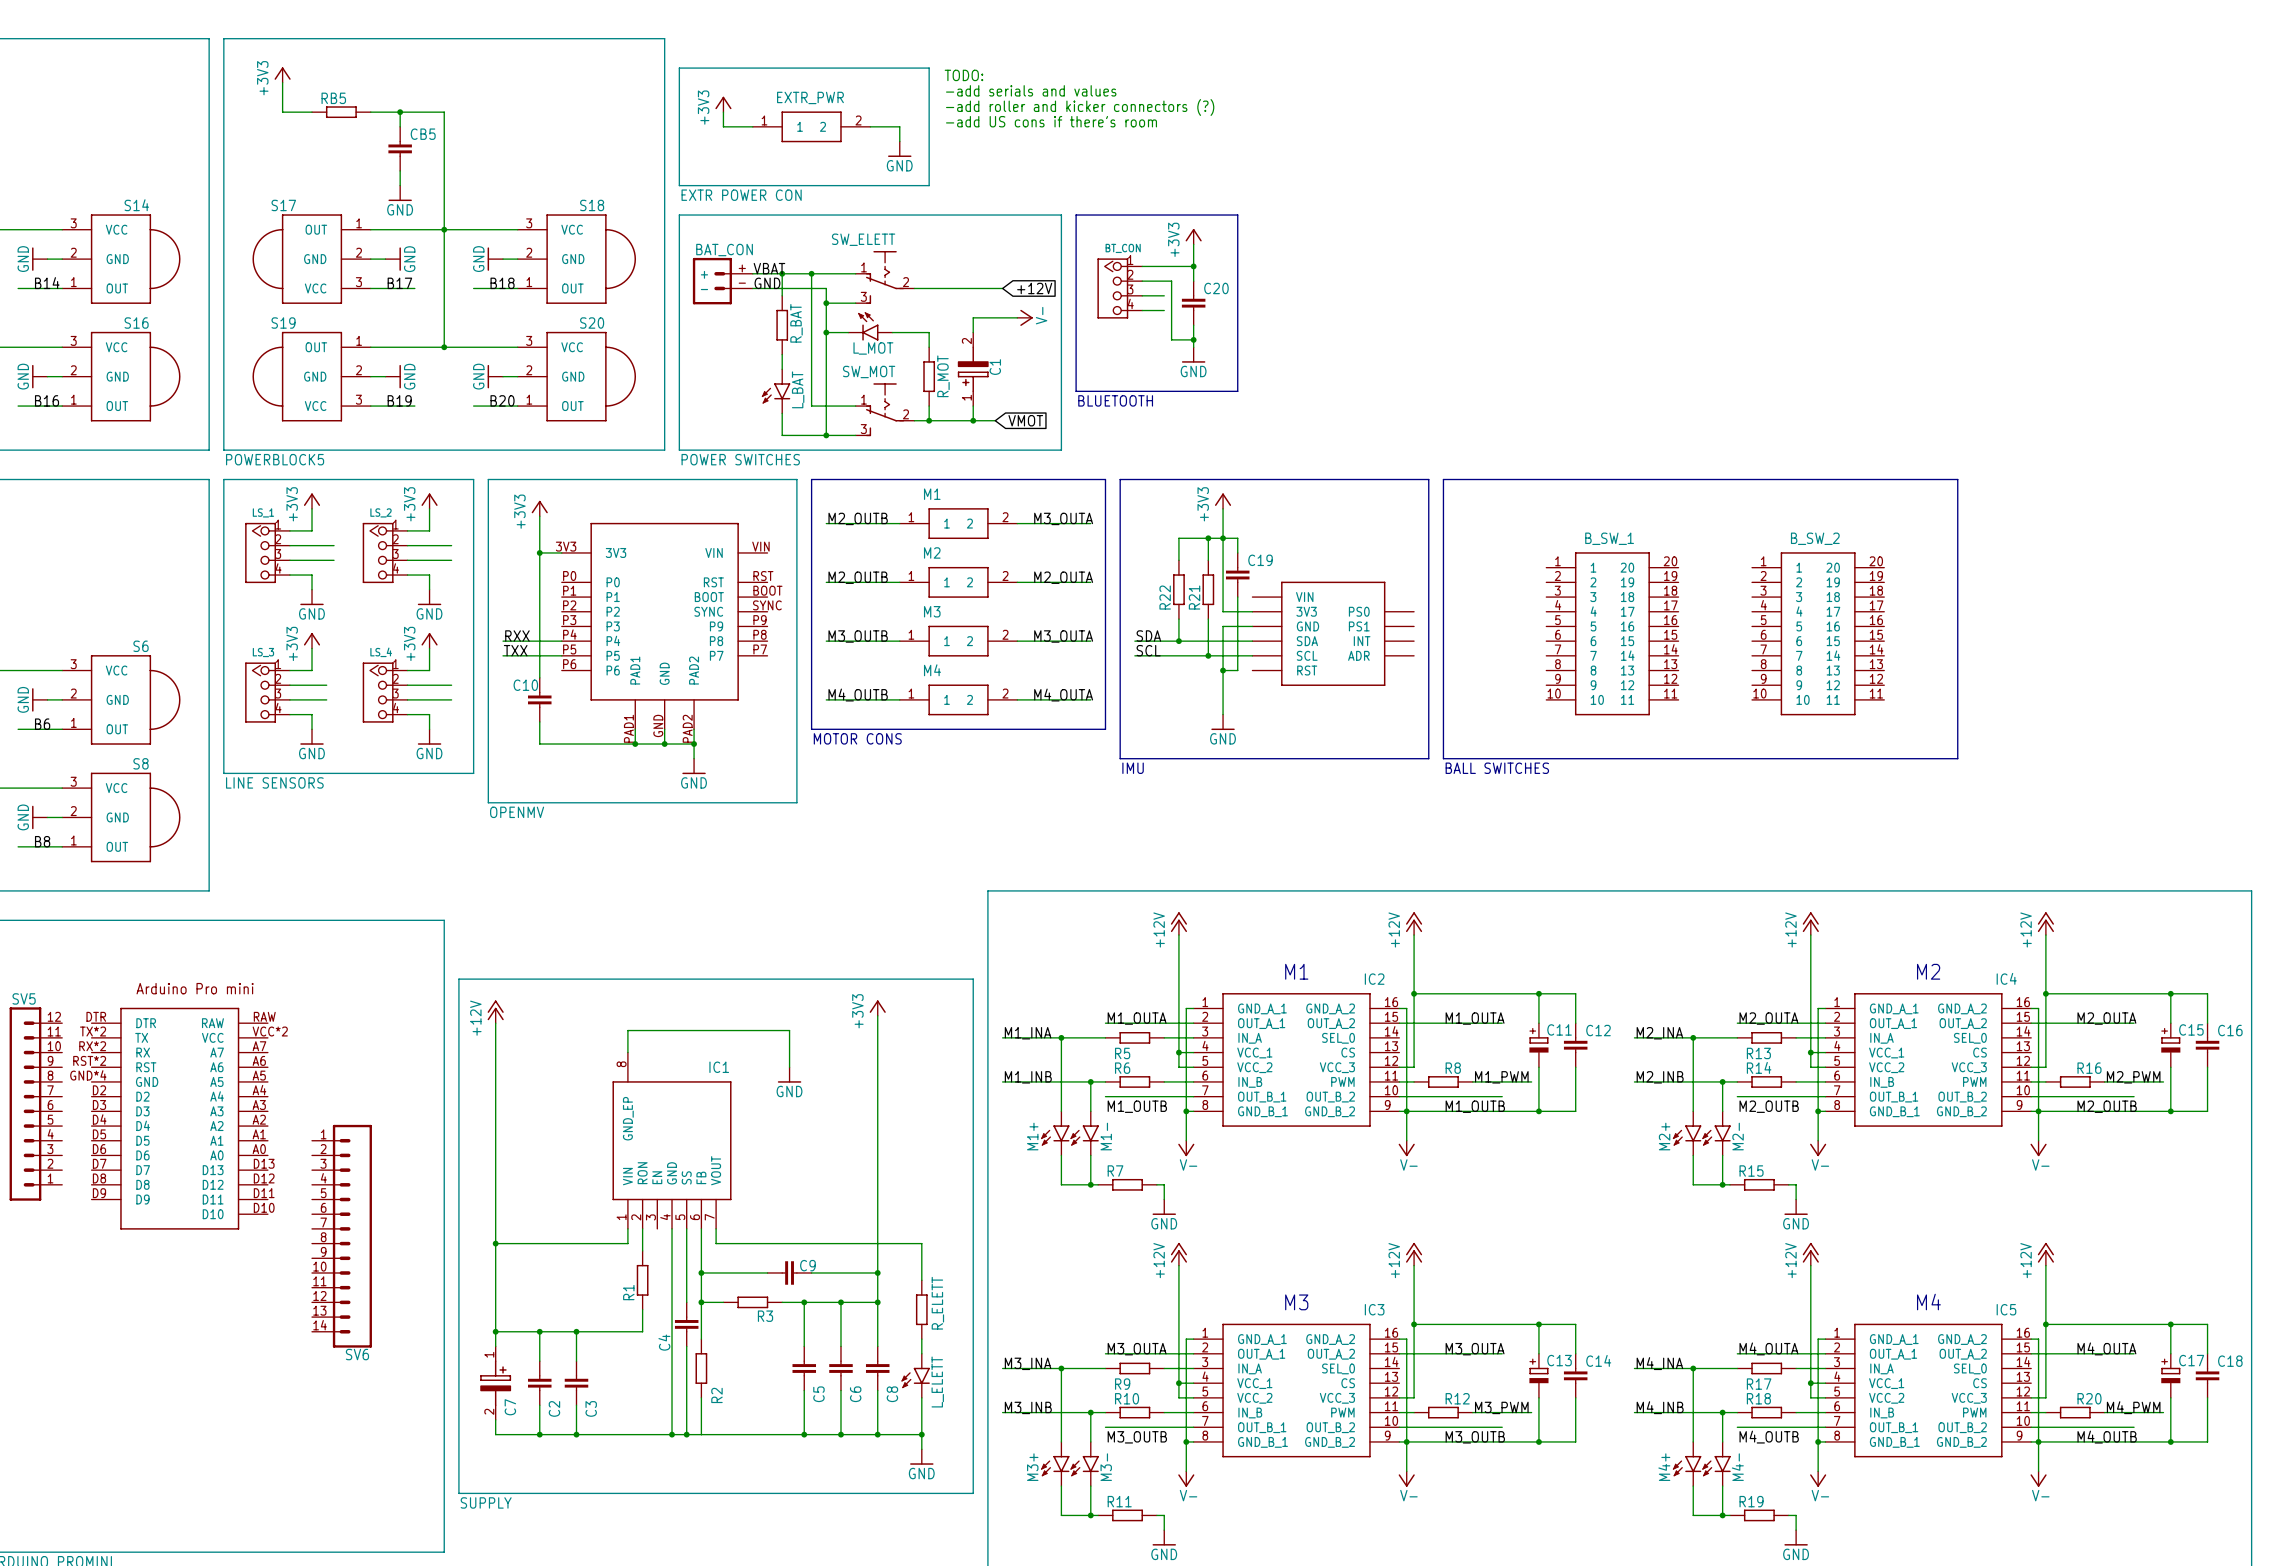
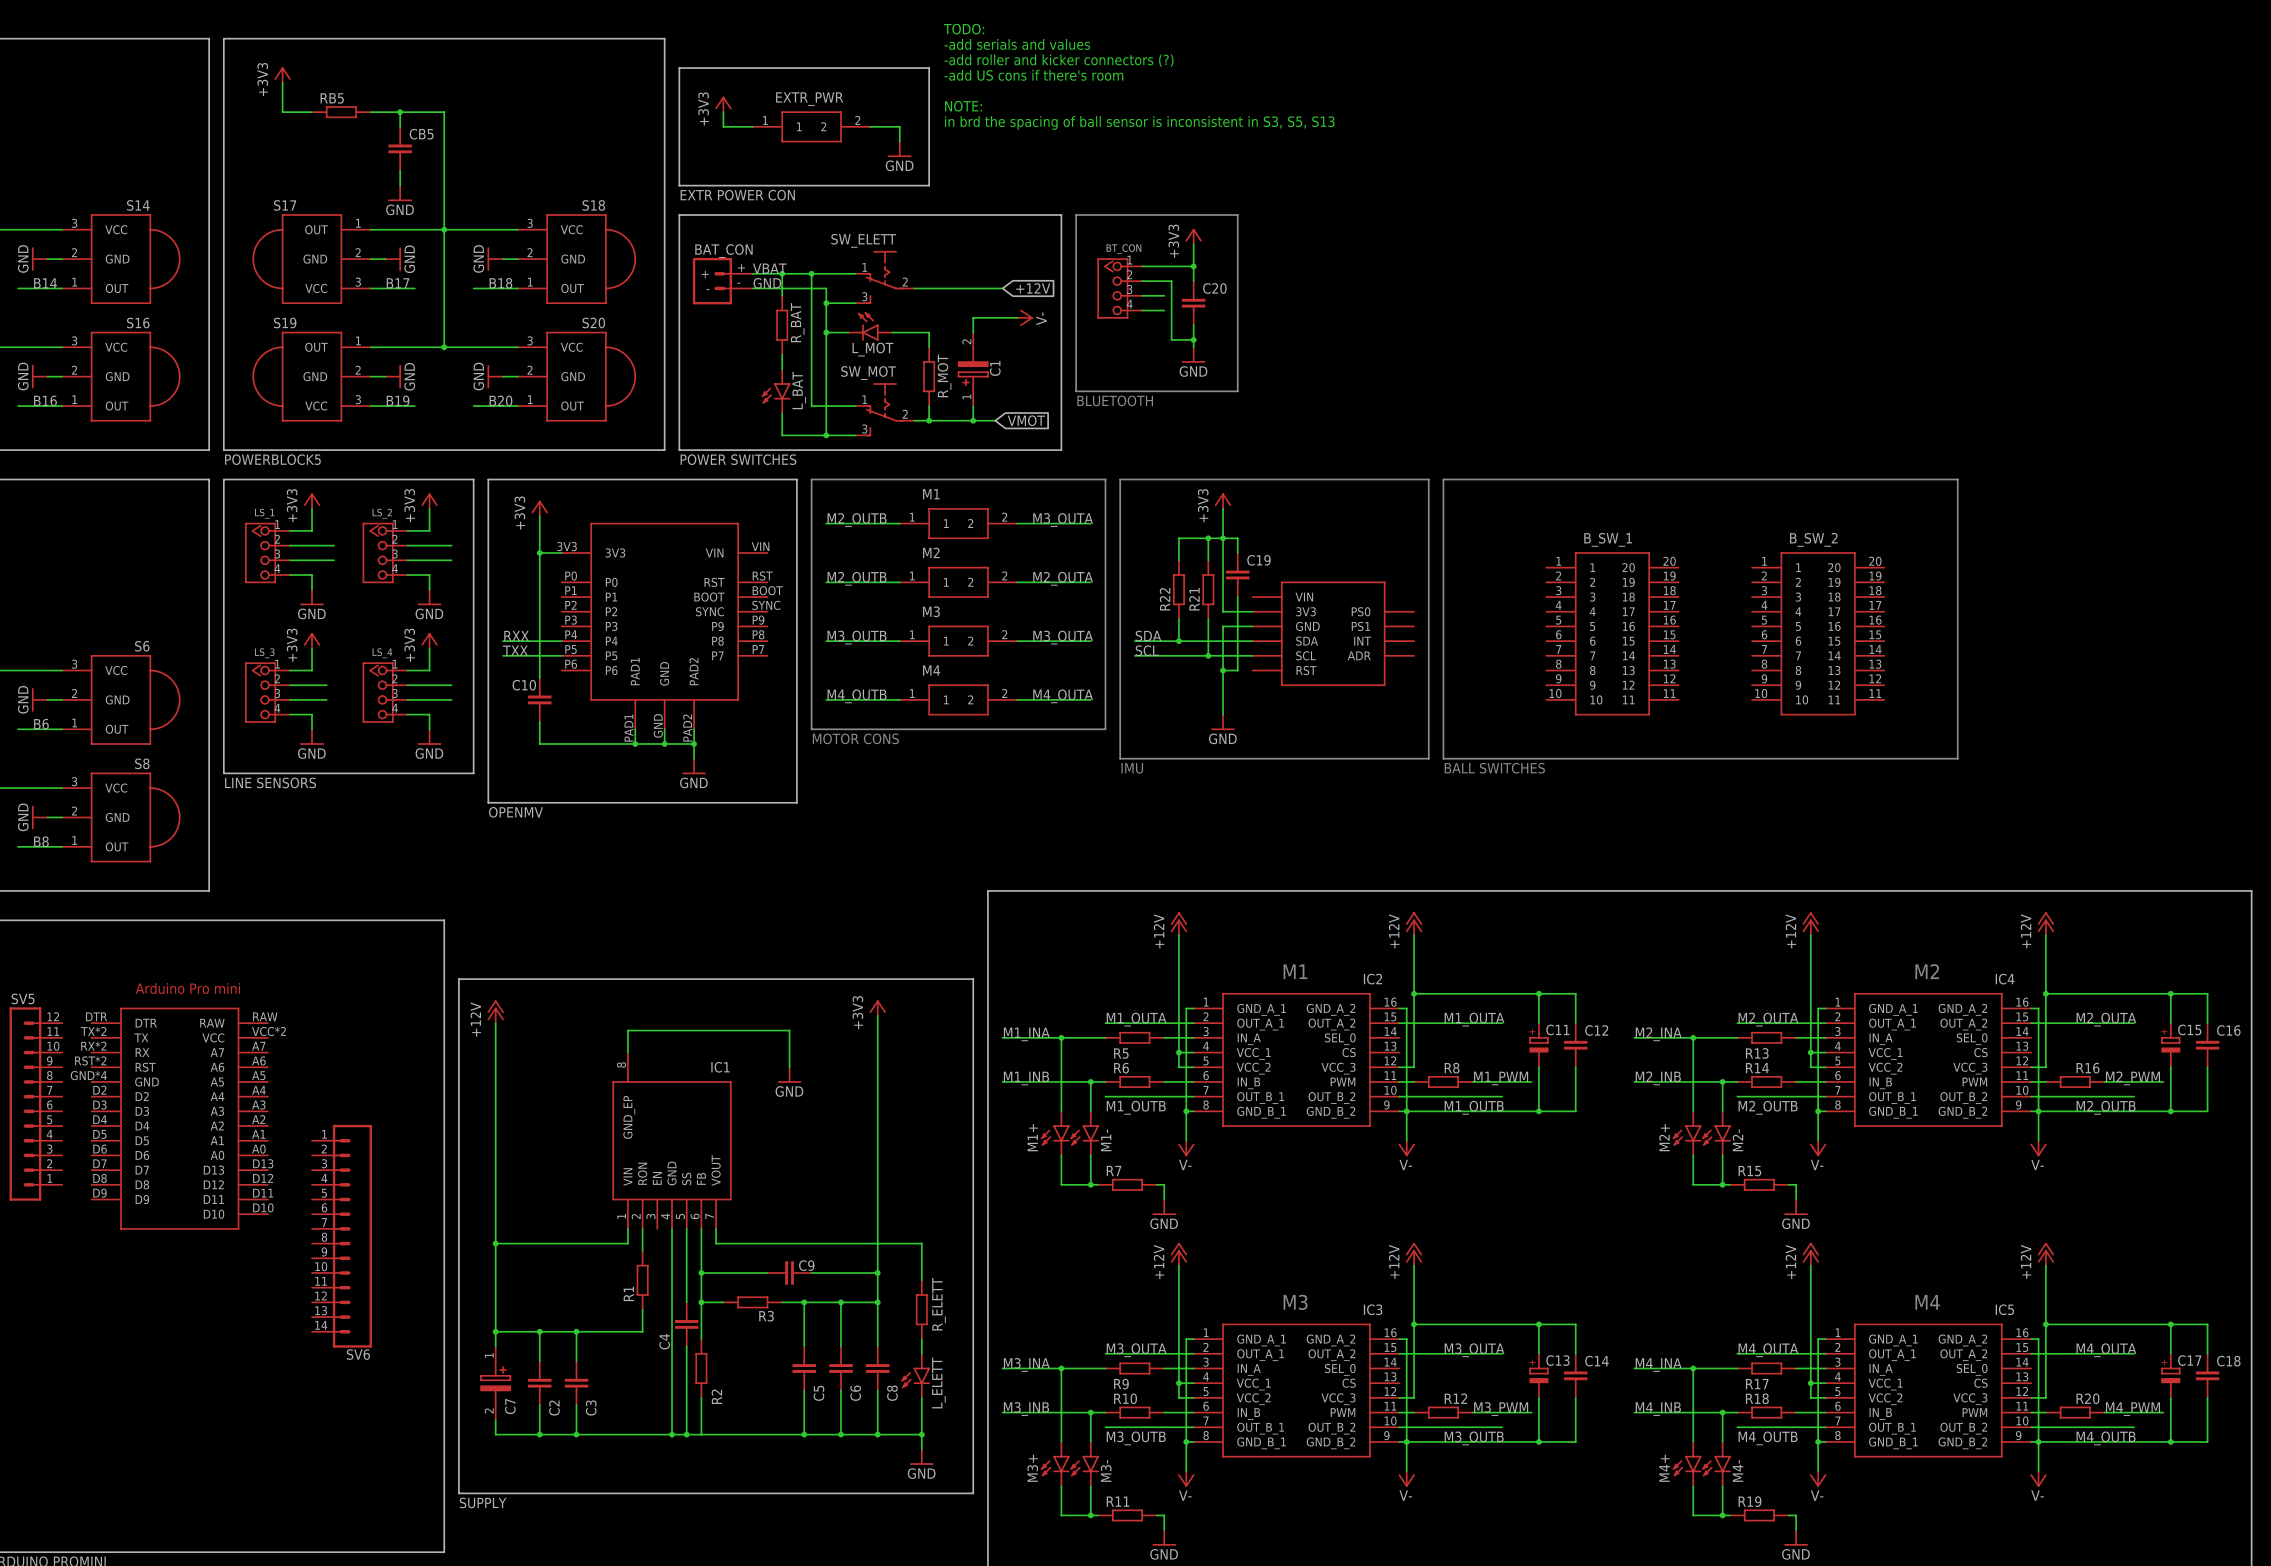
text: none -> TODO: (963, 29)
text: none -> -add roller and kicker connectors (?) (1058, 60)
text: TODO: (964, 75) -> -add US cons if there's room (1033, 75)
text position: -add serials and values (1031, 90) -> -add serials and values (1017, 44)
text: -add roller and kicker connectors (?) (1080, 107) -> NOTE: (963, 106)
text: -add US cons if there's room (1051, 121) -> in brd the spacing of ball sensor is inconsistent in S3, S5, S13 (1139, 122)

